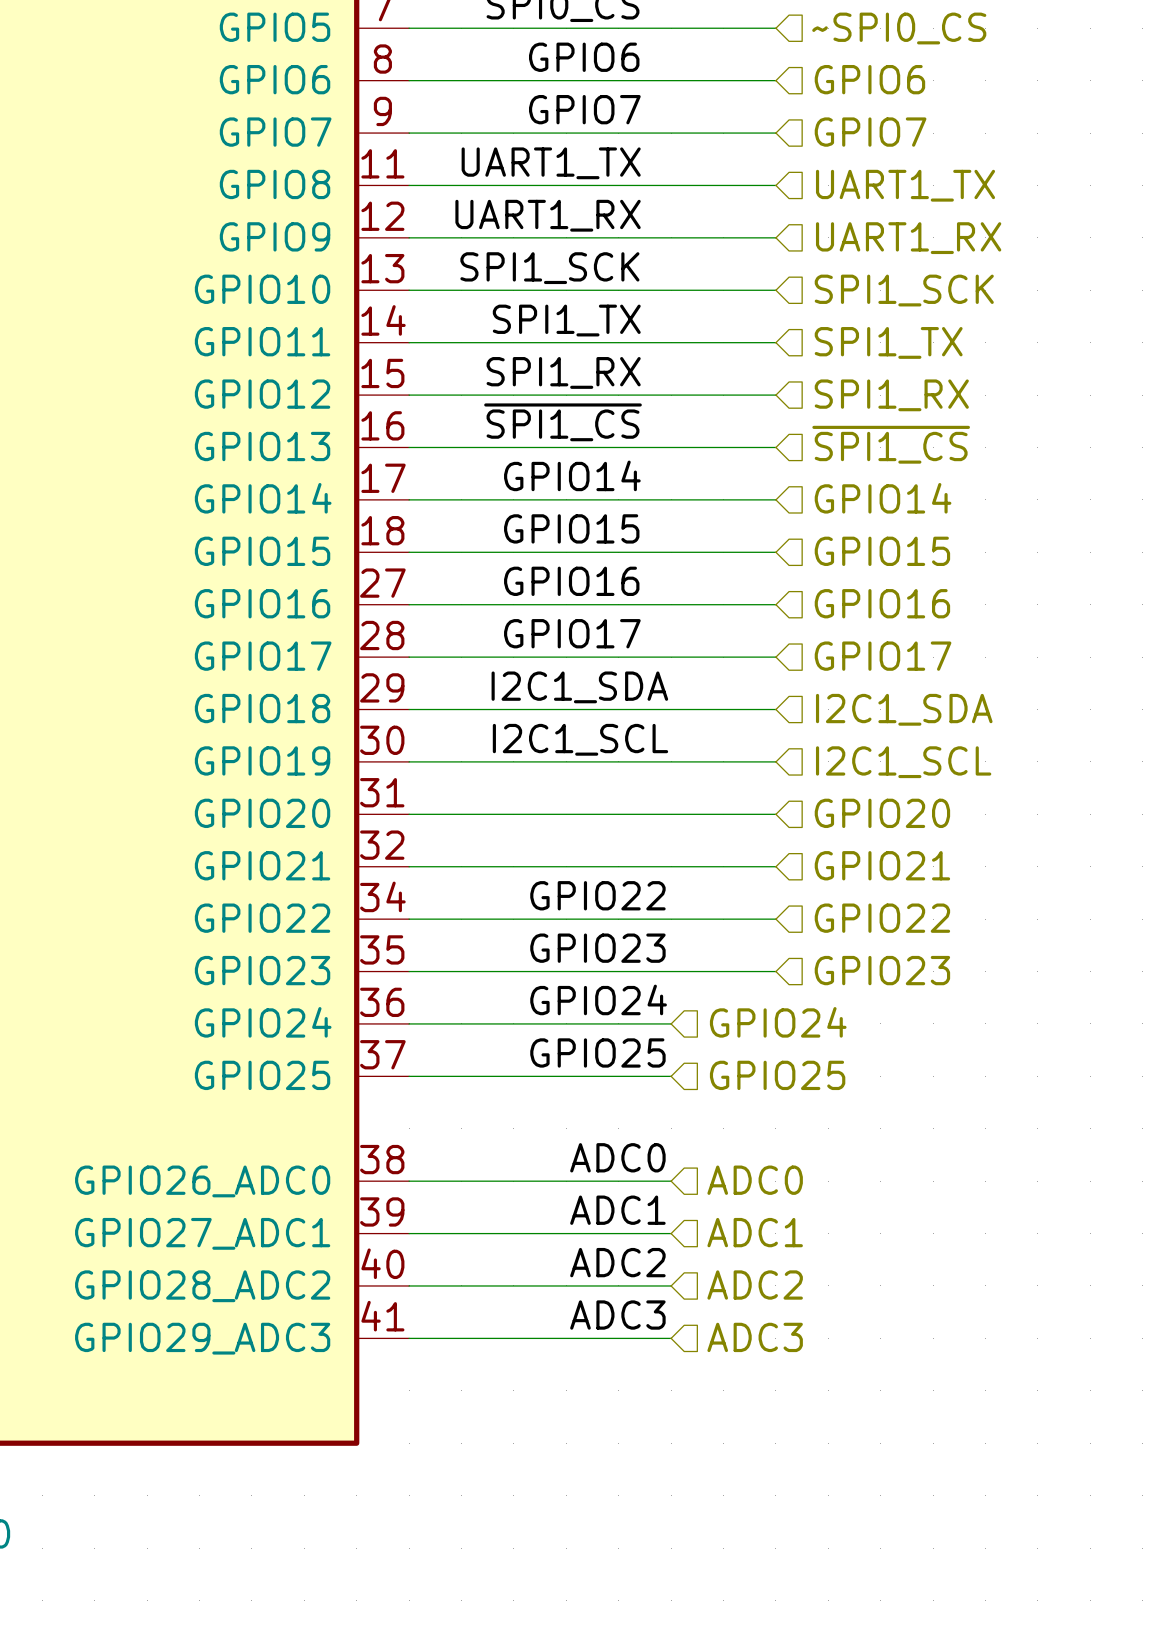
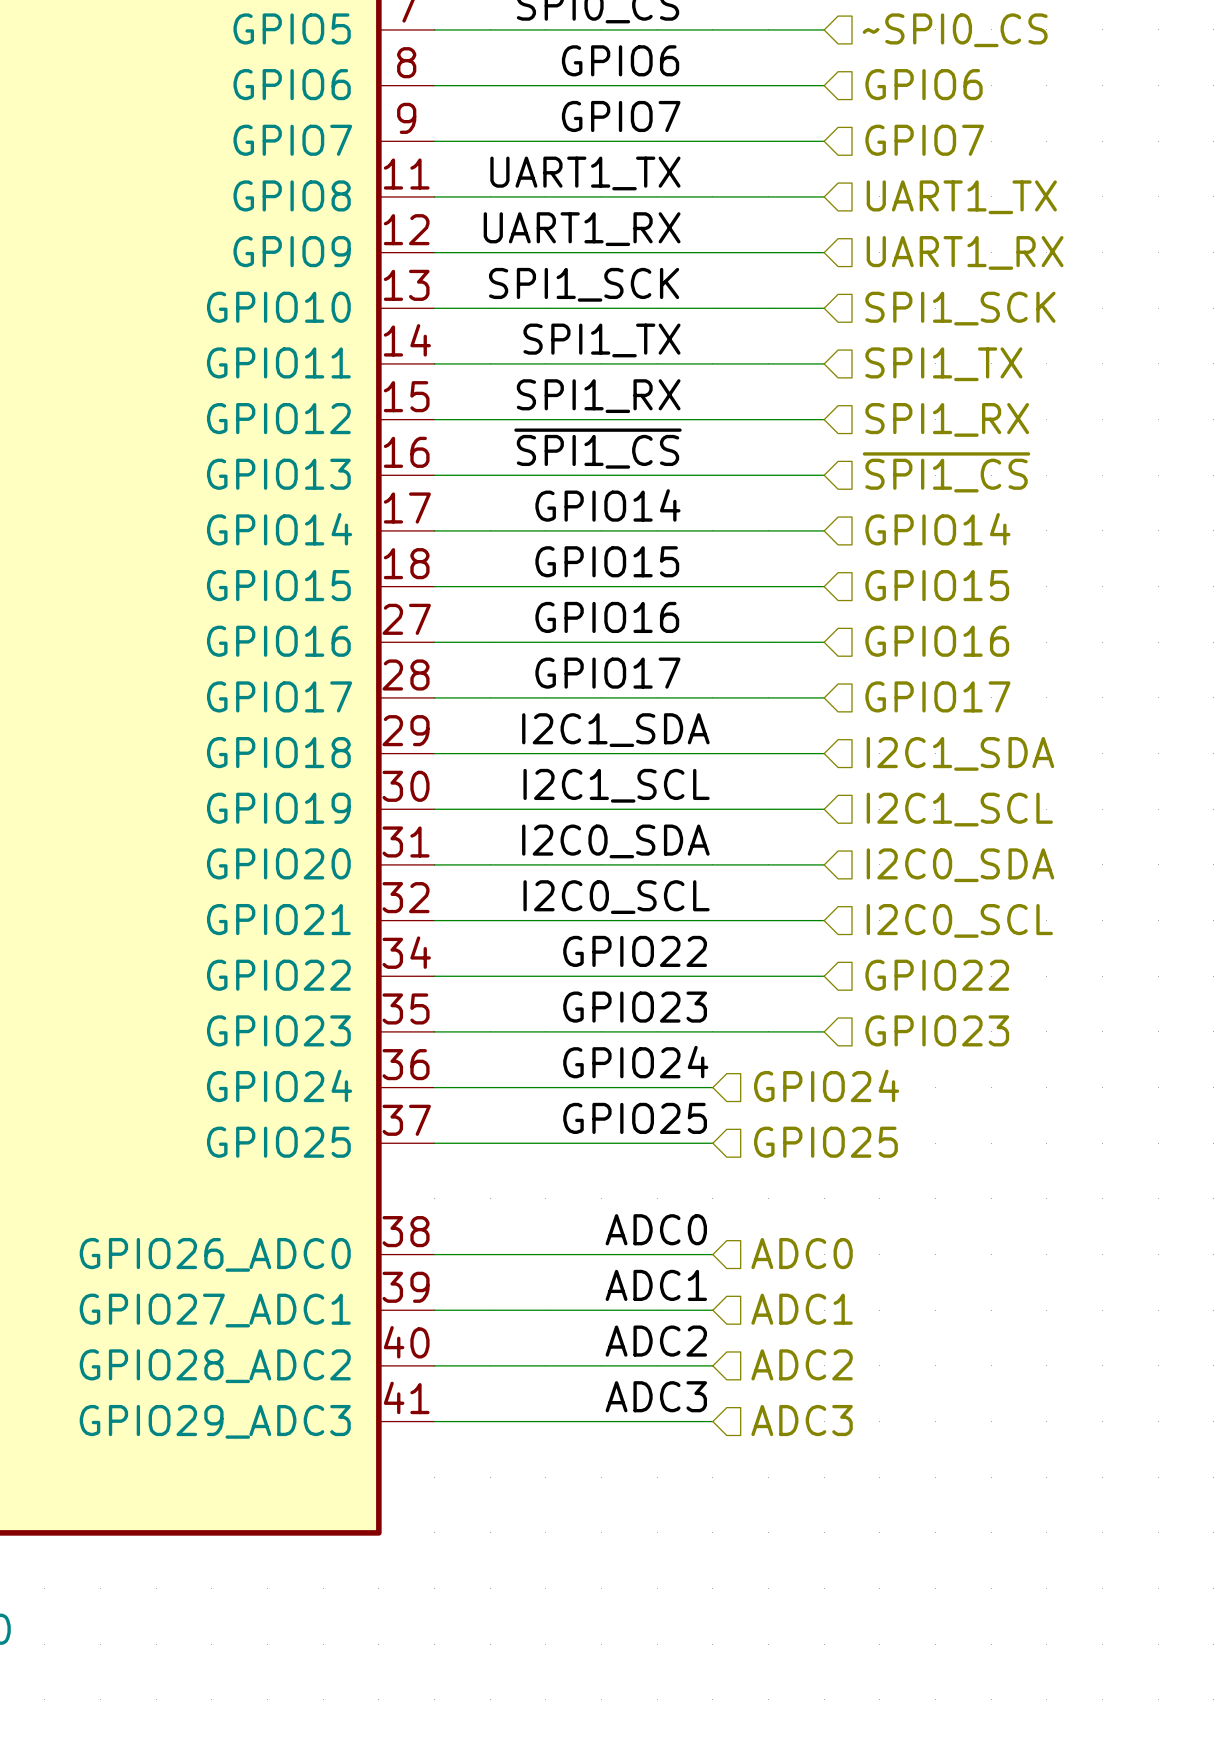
label: none -> I2C0_SDA (615, 841)
hierarchical label: GPIO20 (882, 813) -> I2C0_SDA (960, 865)
label: none -> I2C0_SCL (616, 897)
hierarchical label: GPIO21 (882, 865) -> I2C0_SCL (959, 920)

